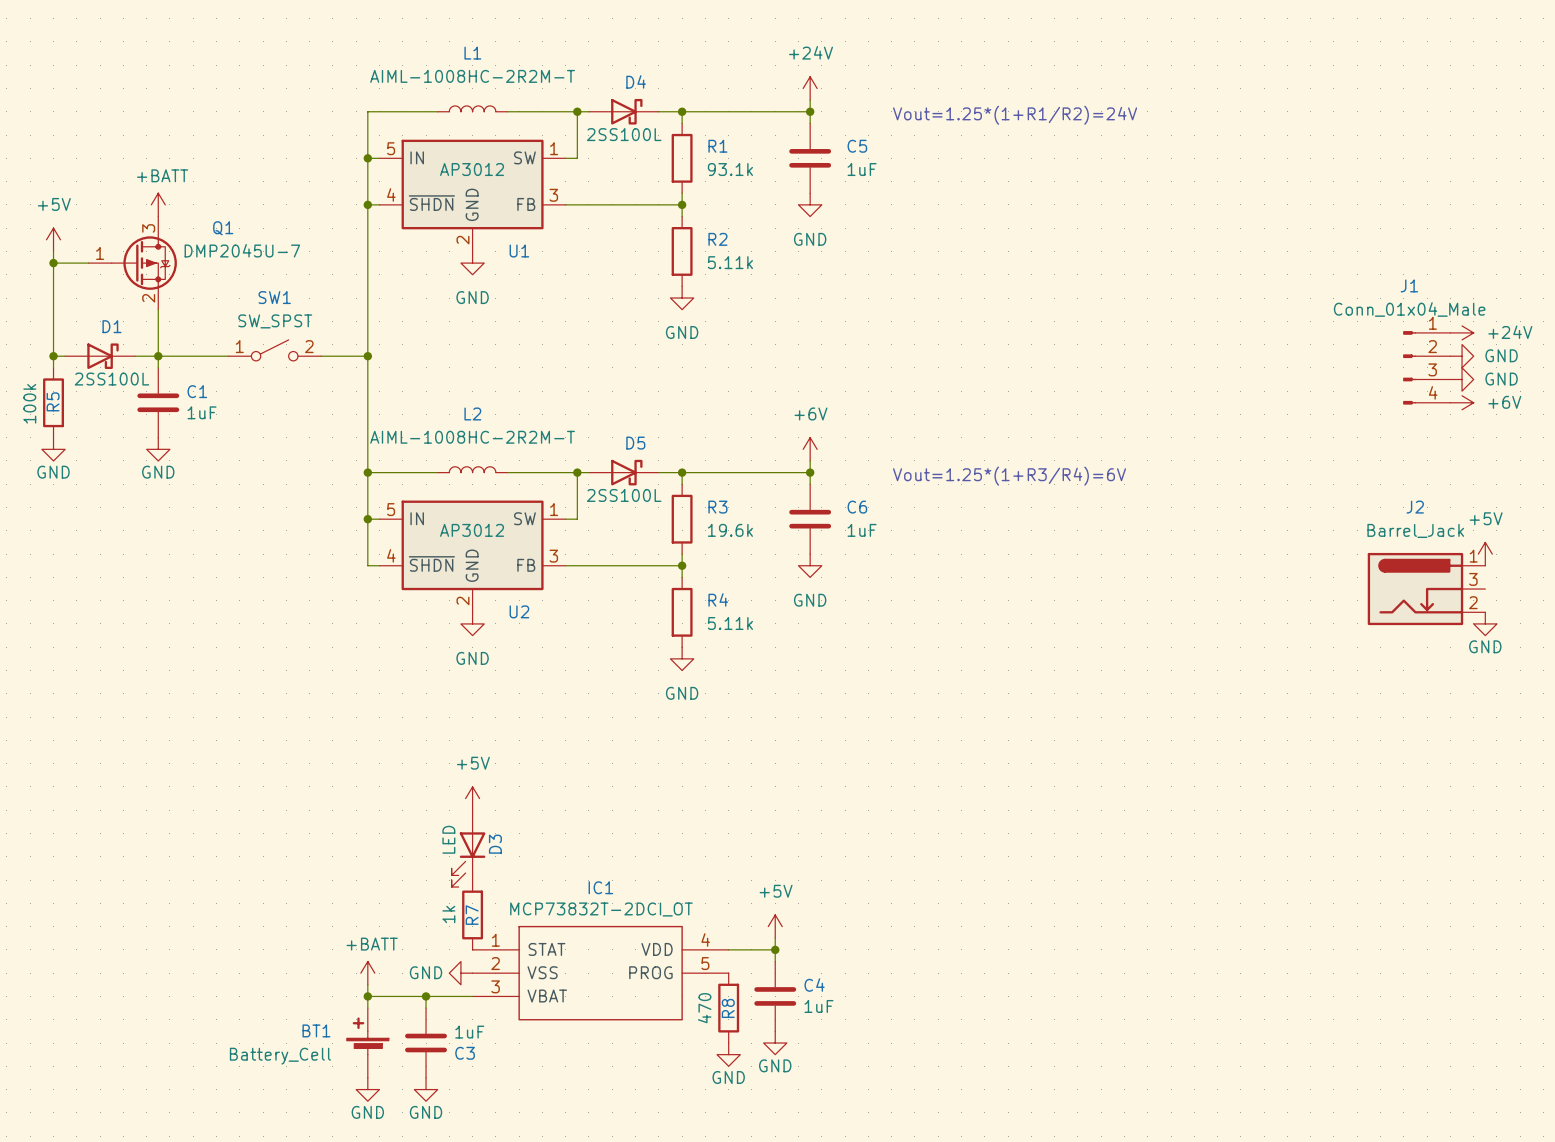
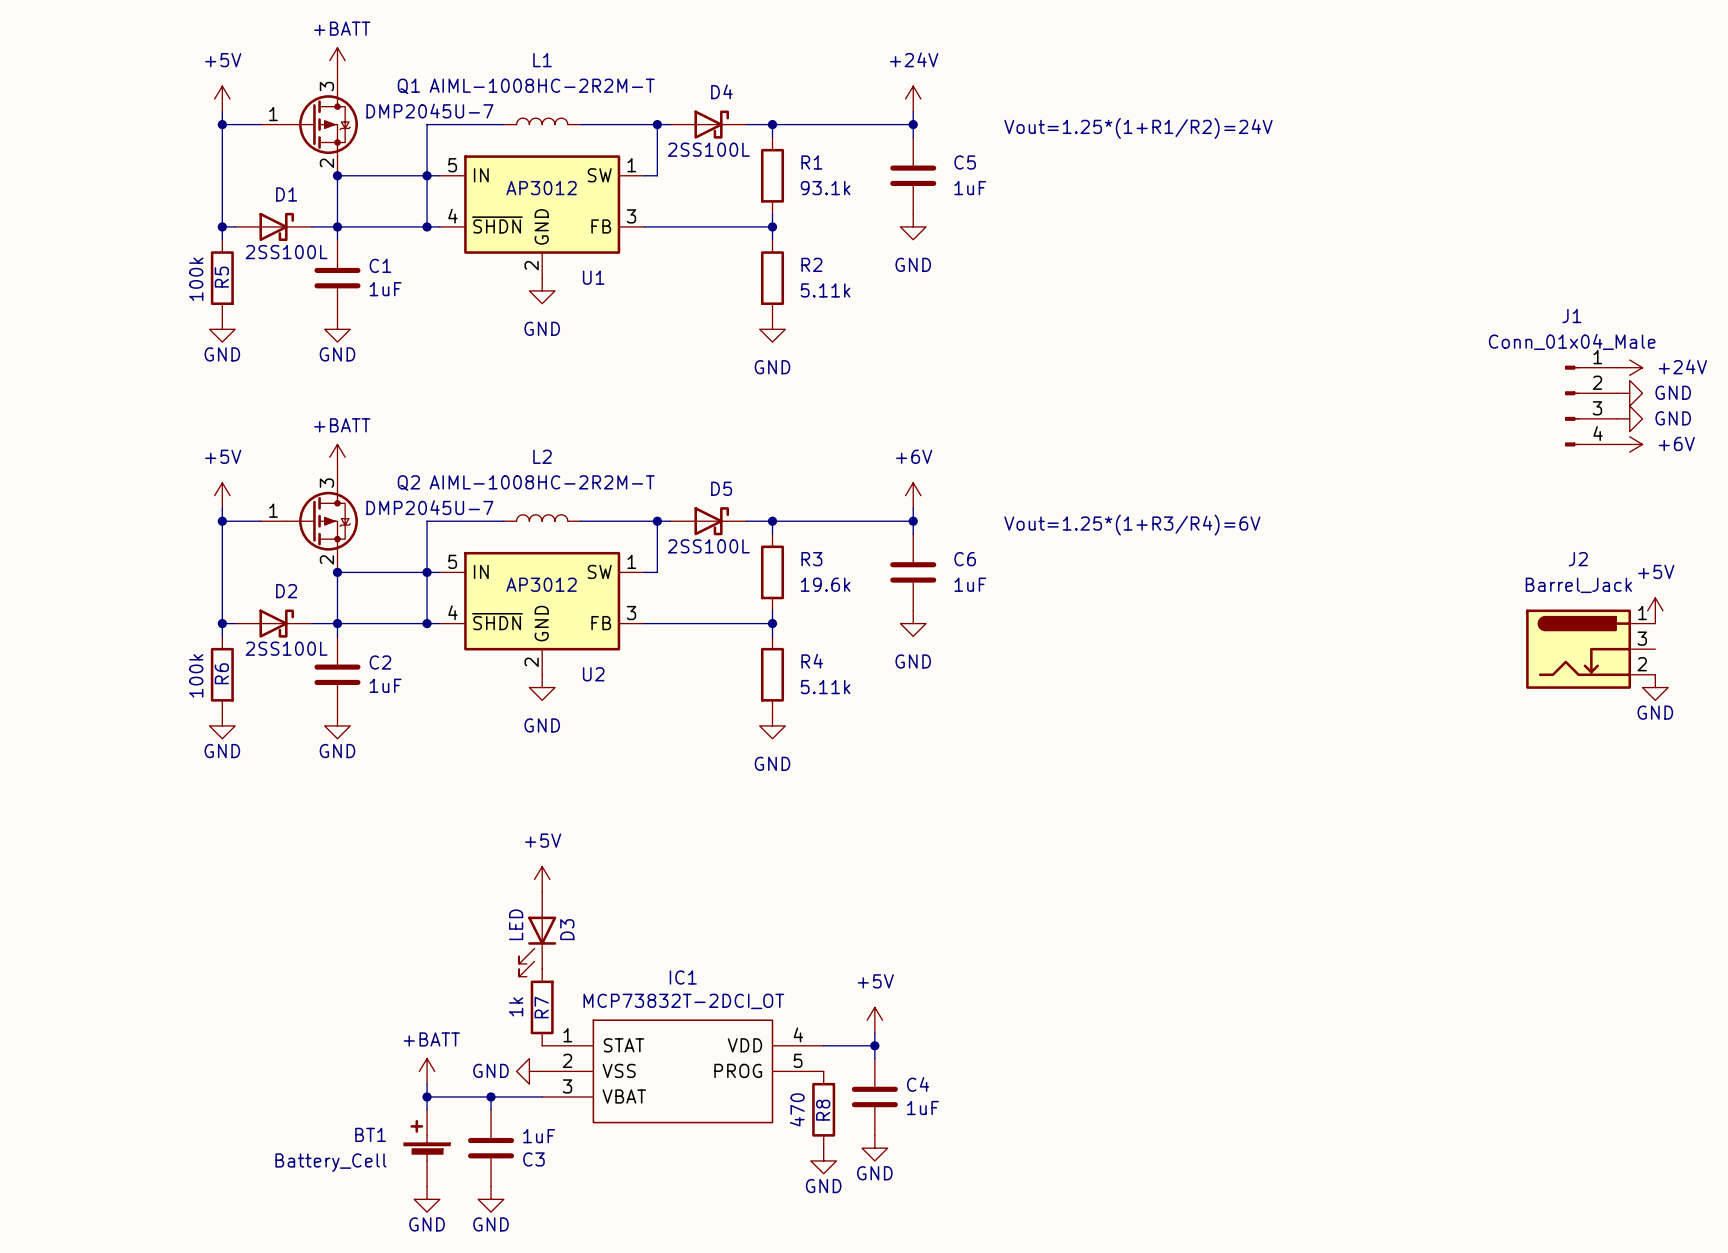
power symbol: none -> +BATT (337, 60)
power symbol: none -> +5V (222, 99)
junction: none -> (222, 124)
junction: none -> (337, 175)
wire: none -> (427, 175) (337, 175) (337, 239)
power symbol: +BATT (158, 204) -> none
junction: none -> (222, 226)
junction: none -> (337, 226)
wire: (367, 204) (367, 472) -> (427, 226) (311, 226)
power symbol: +5V (53, 239) -> none
wire: (53, 251) (53, 367) -> (222, 111) (222, 239)
wire: (53, 263) (88, 263) -> (222, 124) (260, 124)
junction: (53, 263) -> none
Q1 position: (132, 263) -> (309, 124)
power symbol: none -> GND (222, 329)
power symbol: none -> GND (337, 329)
wire: (158, 309) (158, 367) -> none
SW1: SW_SPST (274, 350) -> none
wire: (53, 356) (65, 356) -> (222, 226) (235, 226)
junction: (53, 356) -> none
D1 position: (100, 356) -> (273, 226)
wire: (135, 356) (228, 356) -> none
junction: (158, 356) -> none
wire: (321, 356) (367, 356) -> none
junction: (367, 356) -> none
R5 position: (53, 402) -> (222, 278)
C1 position: (158, 402) -> (337, 278)
power symbol: none -> +BATT (337, 457)
power symbol: GND (53, 449) -> none
power symbol: GND (158, 449) -> none
power symbol: none -> +5V (222, 495)
wire: none -> (222, 508) (222, 636)
wire: none -> (222, 521) (260, 521)
junction: none -> (222, 521)
Q2: none -> DMP2045U-7 (309, 521)
junction: (367, 472) -> none
junction: none -> (337, 572)
wire: none -> (427, 572) (337, 572) (337, 636)
wire: none -> (222, 623) (235, 623)
junction: none -> (222, 623)
D2: none -> 2SS100L (273, 623)
wire: none -> (311, 623) (427, 623)
junction: none -> (337, 623)
junction: none -> (427, 623)
R6: none -> 100k (222, 674)
C2: none -> 1uF (337, 674)
power symbol: none -> GND (222, 725)
power symbol: none -> GND (337, 725)

